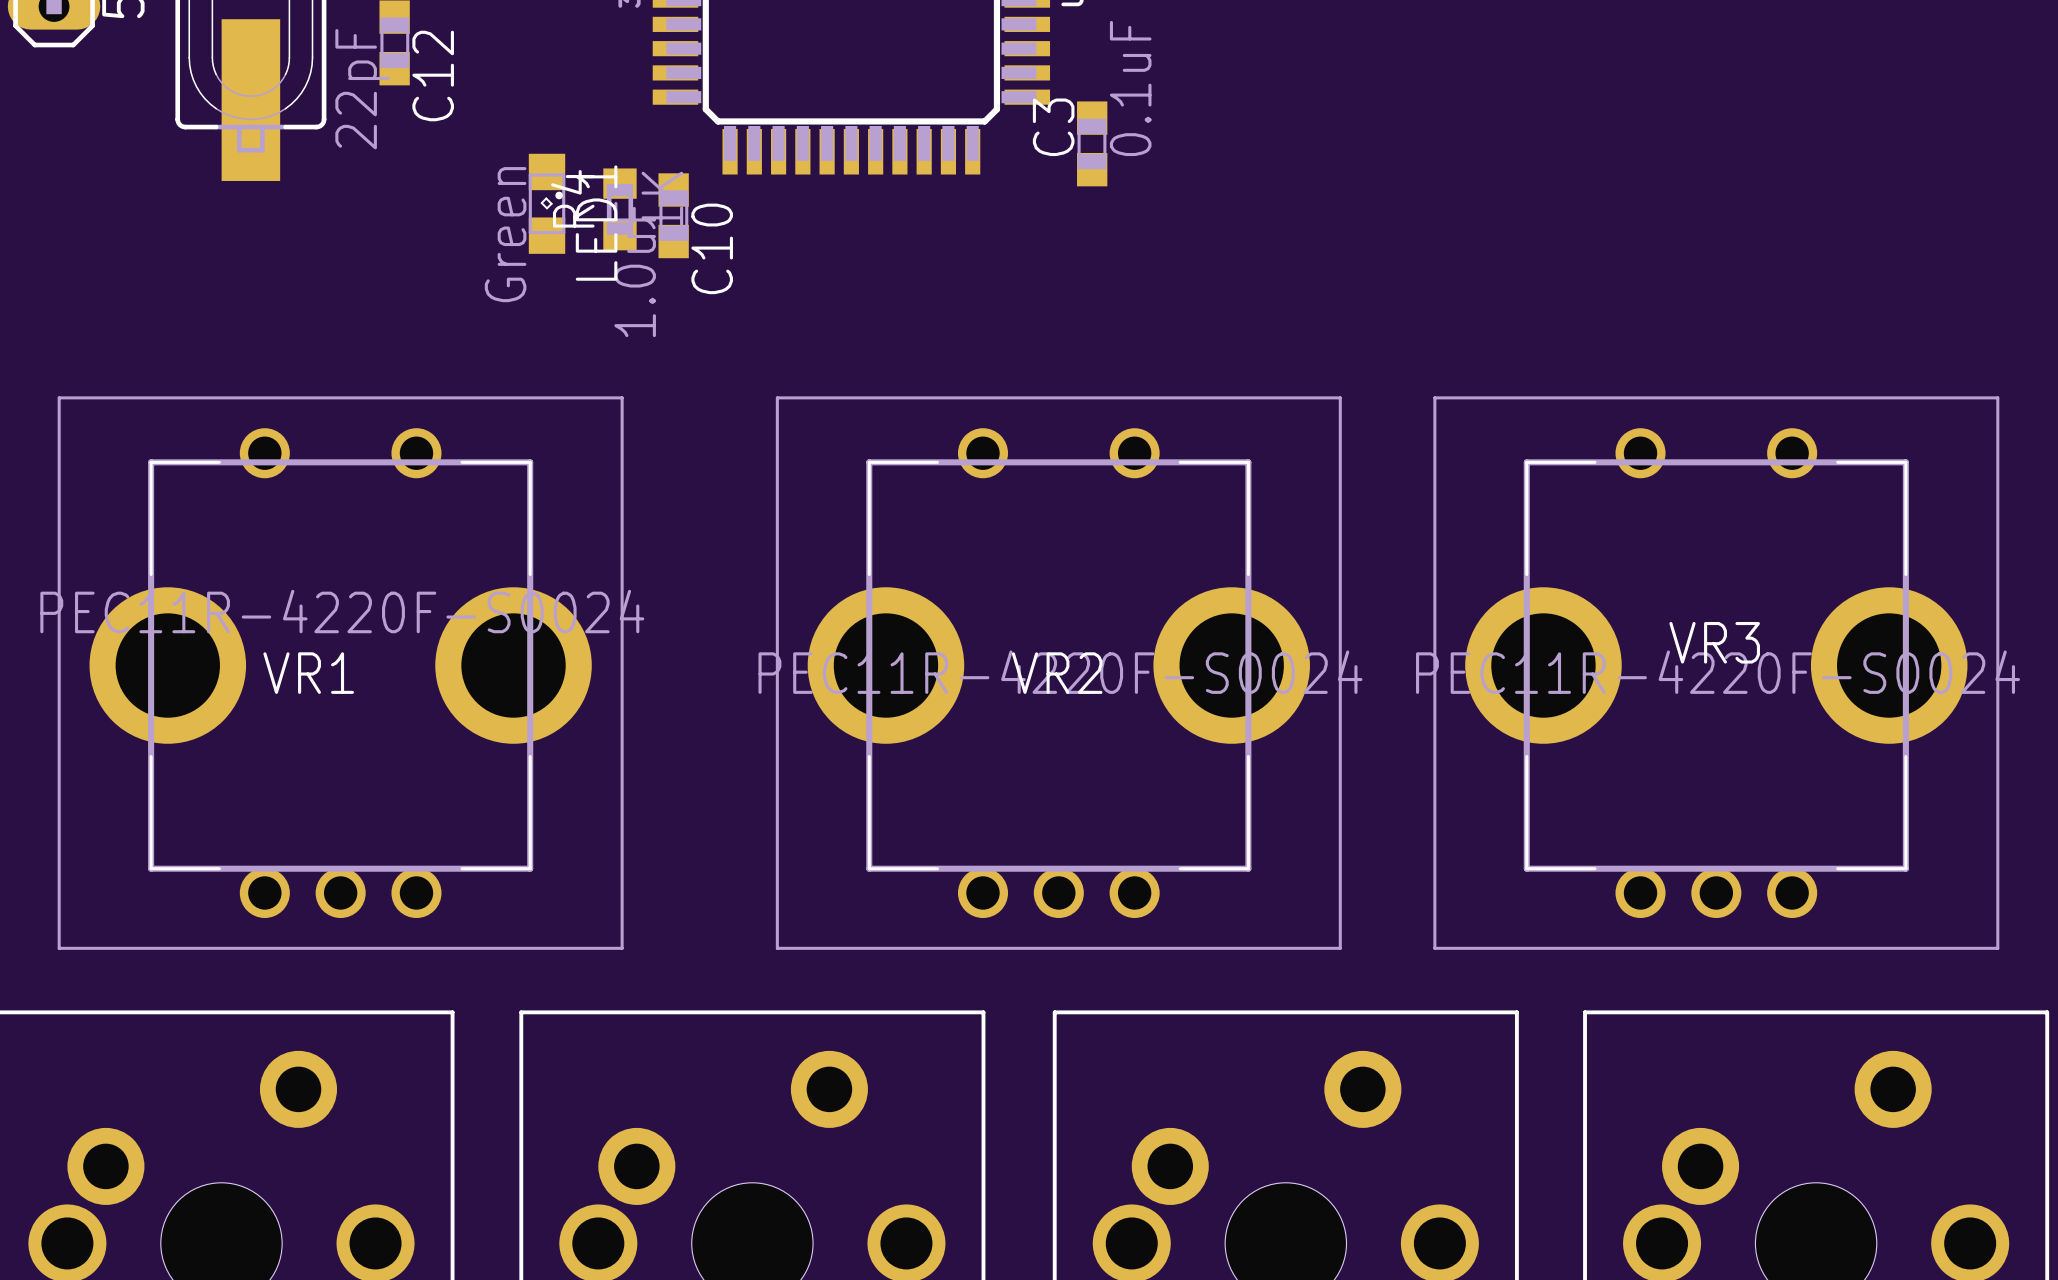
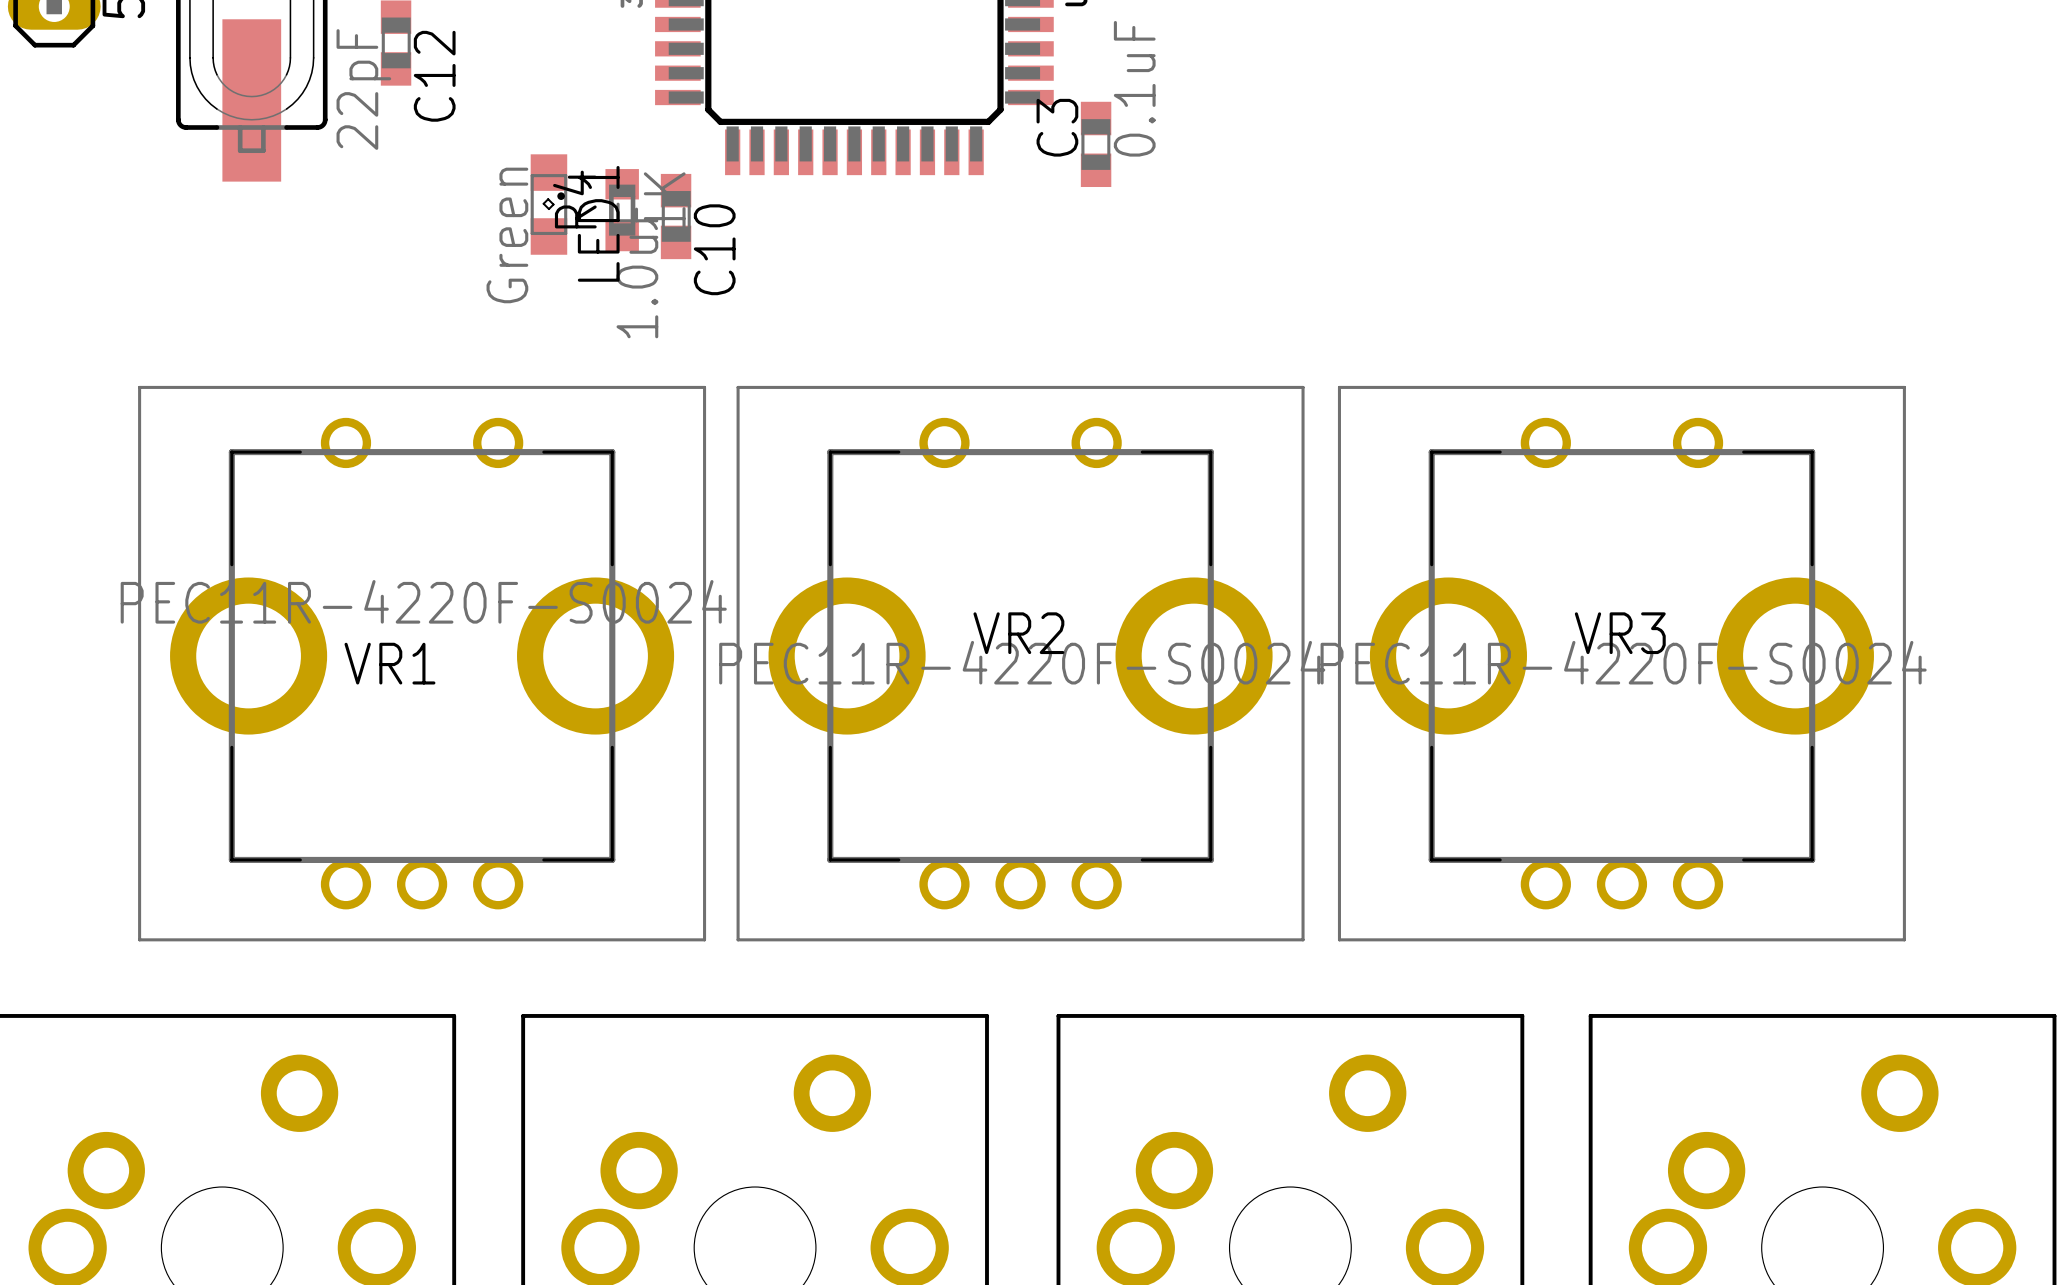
VR1 position: (340, 673) -> (422, 663)
VR2 name position: VR2 (1057, 673) -> VR2 (1018, 633)
VR2 position: (1058, 673) -> (1020, 663)
VR3 position: (1716, 673) -> (1621, 663)

